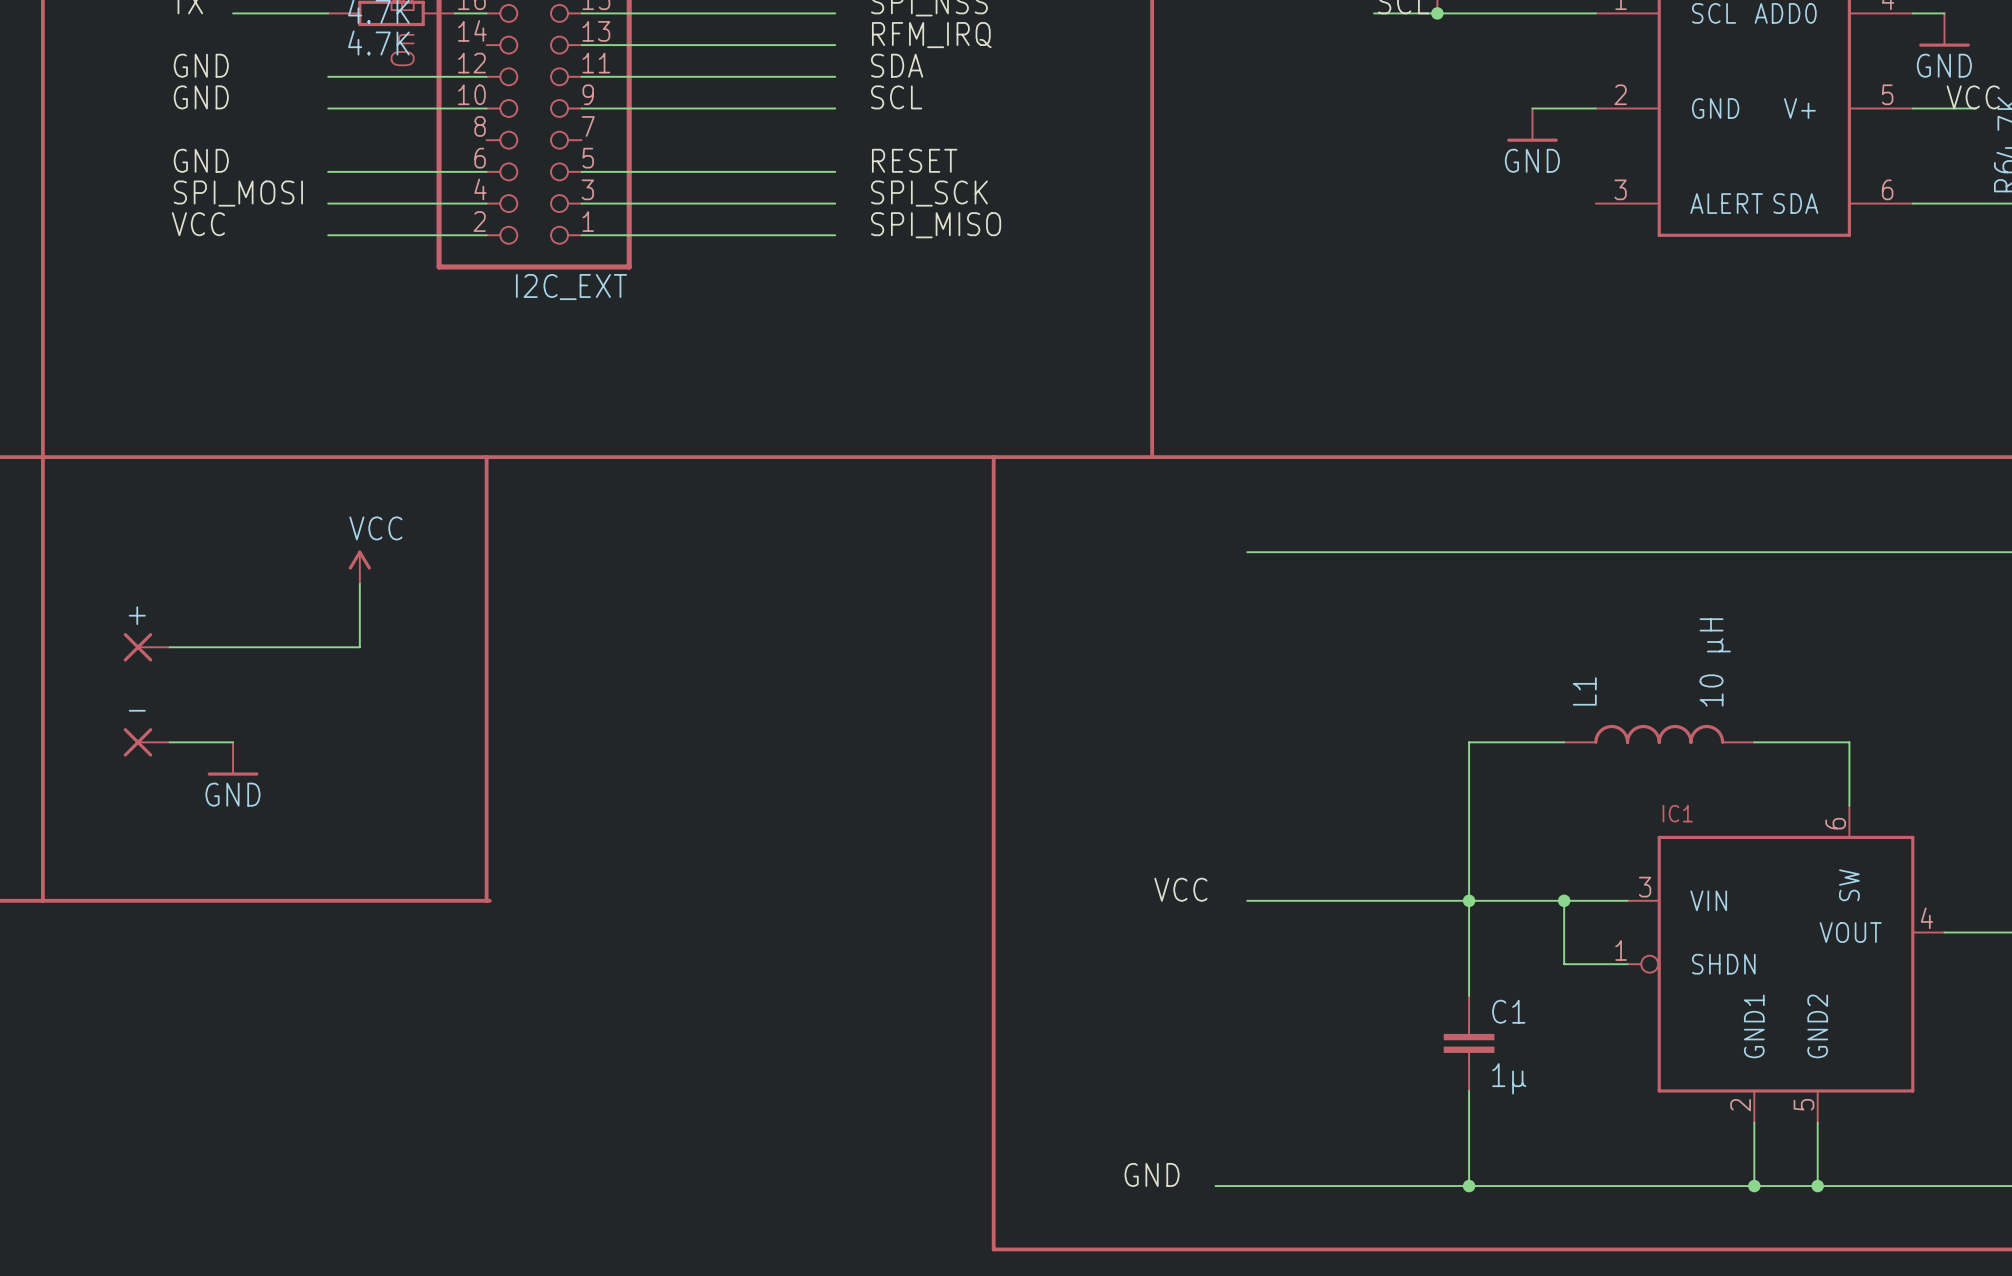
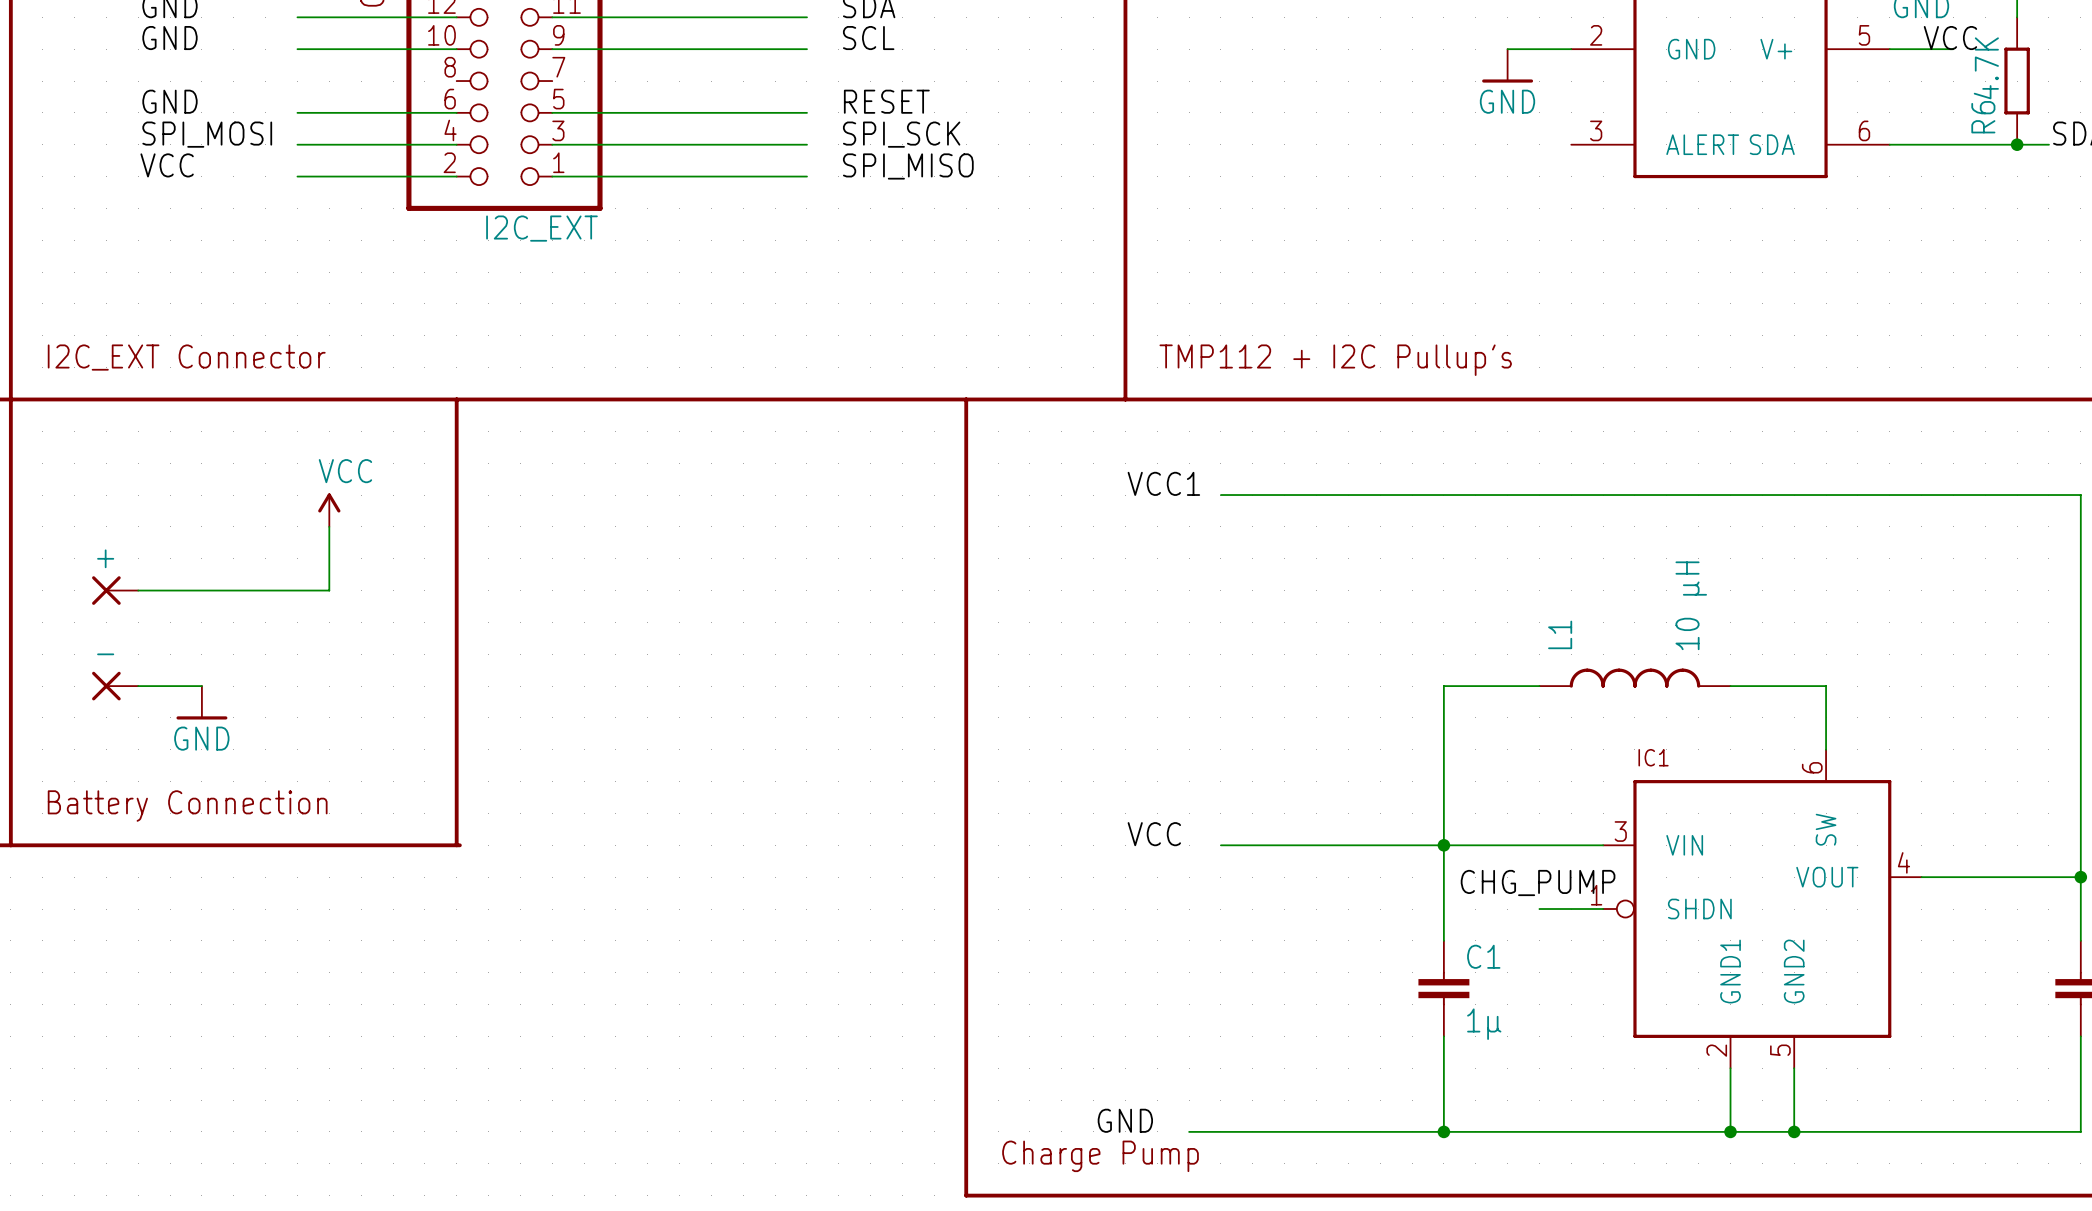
text: none -> I2C_EXT Connector (186, 357)
text: none -> TMP112 + I2C Pullup's (1335, 360)
label: none -> VCC1 (1163, 483)
text: none -> Battery Connection (187, 806)
wire: (1564, 900) (1564, 964) -> none
junction: (1564, 900) -> none
label: none -> CHG_PUMP (1538, 882)
text: none -> Charge Pump (1100, 1156)

